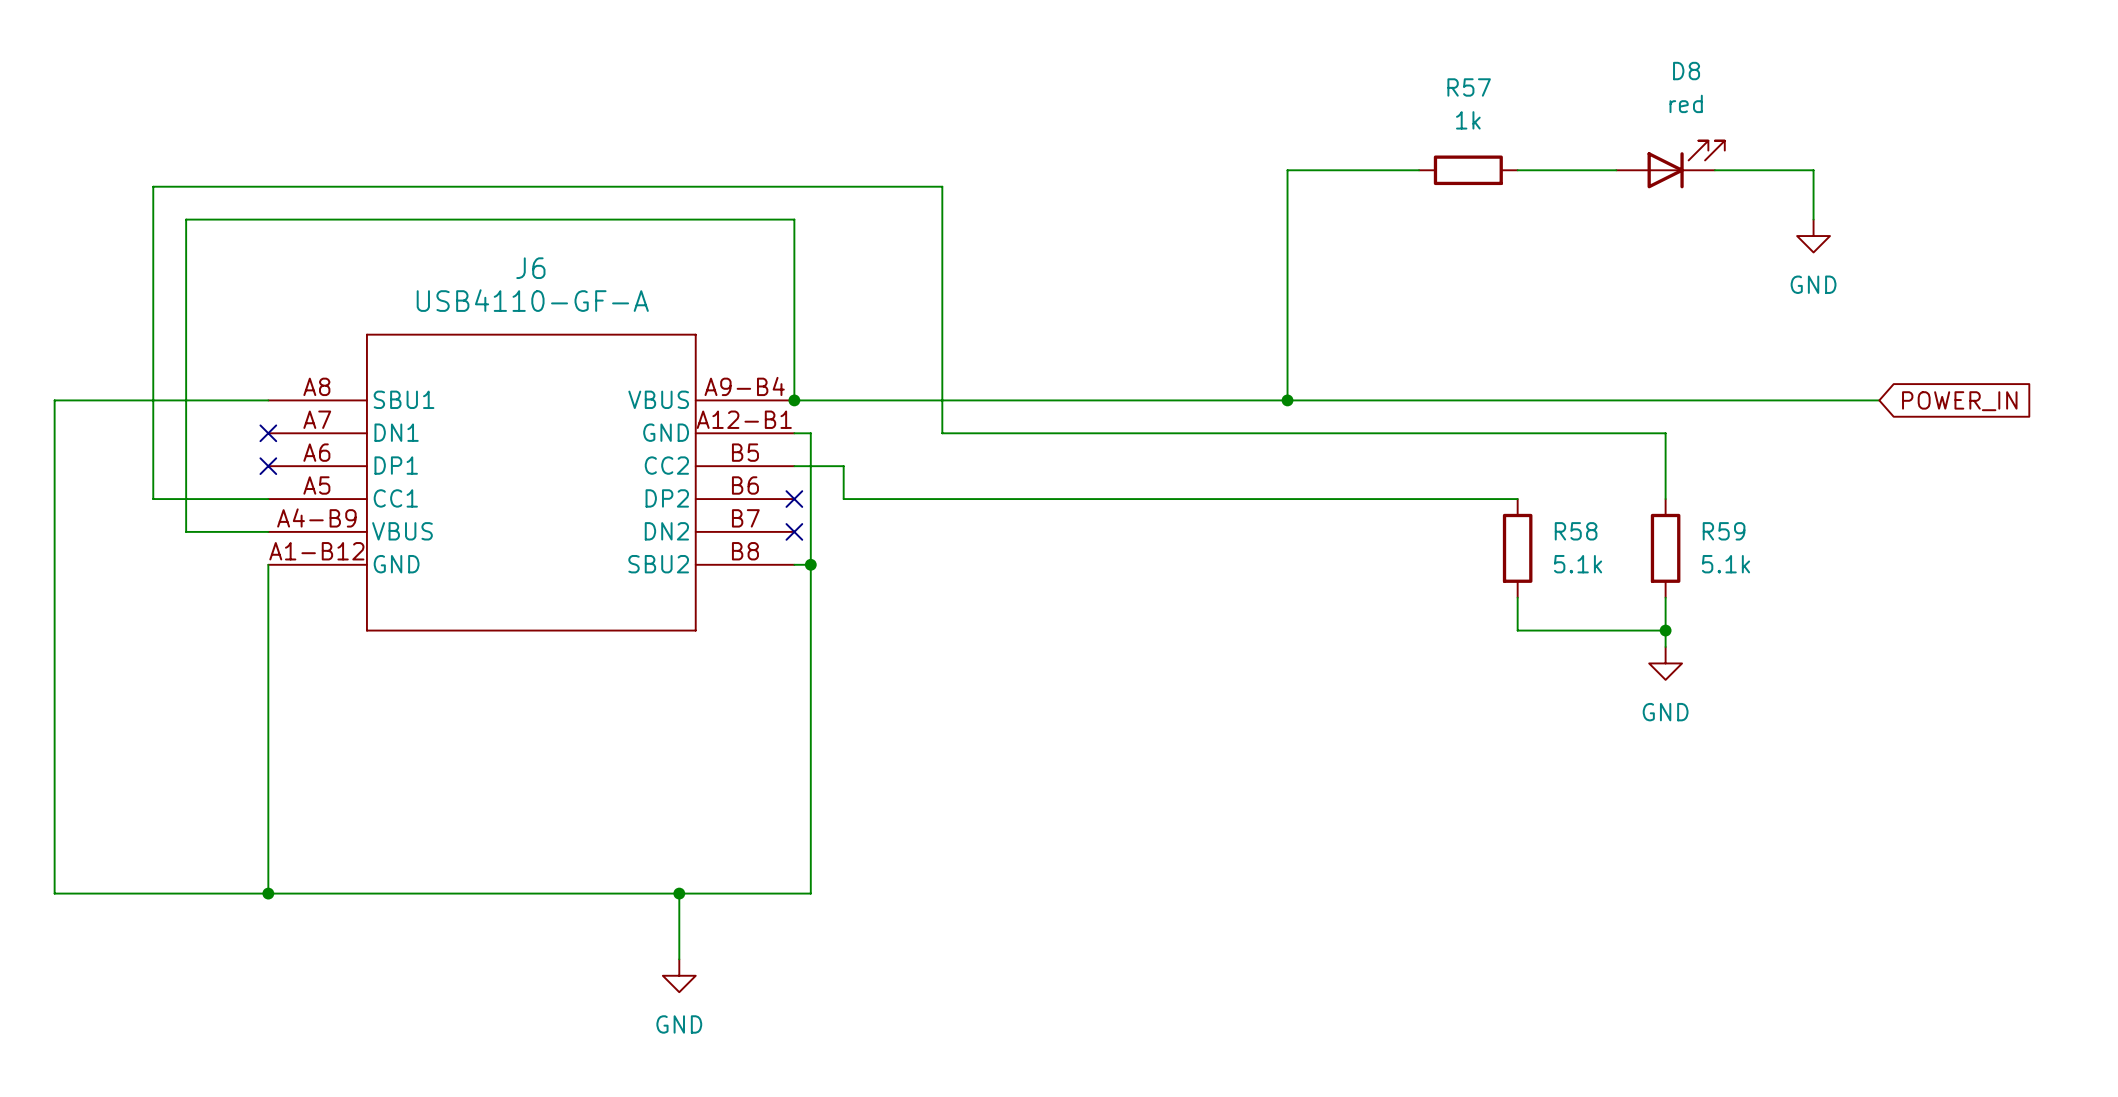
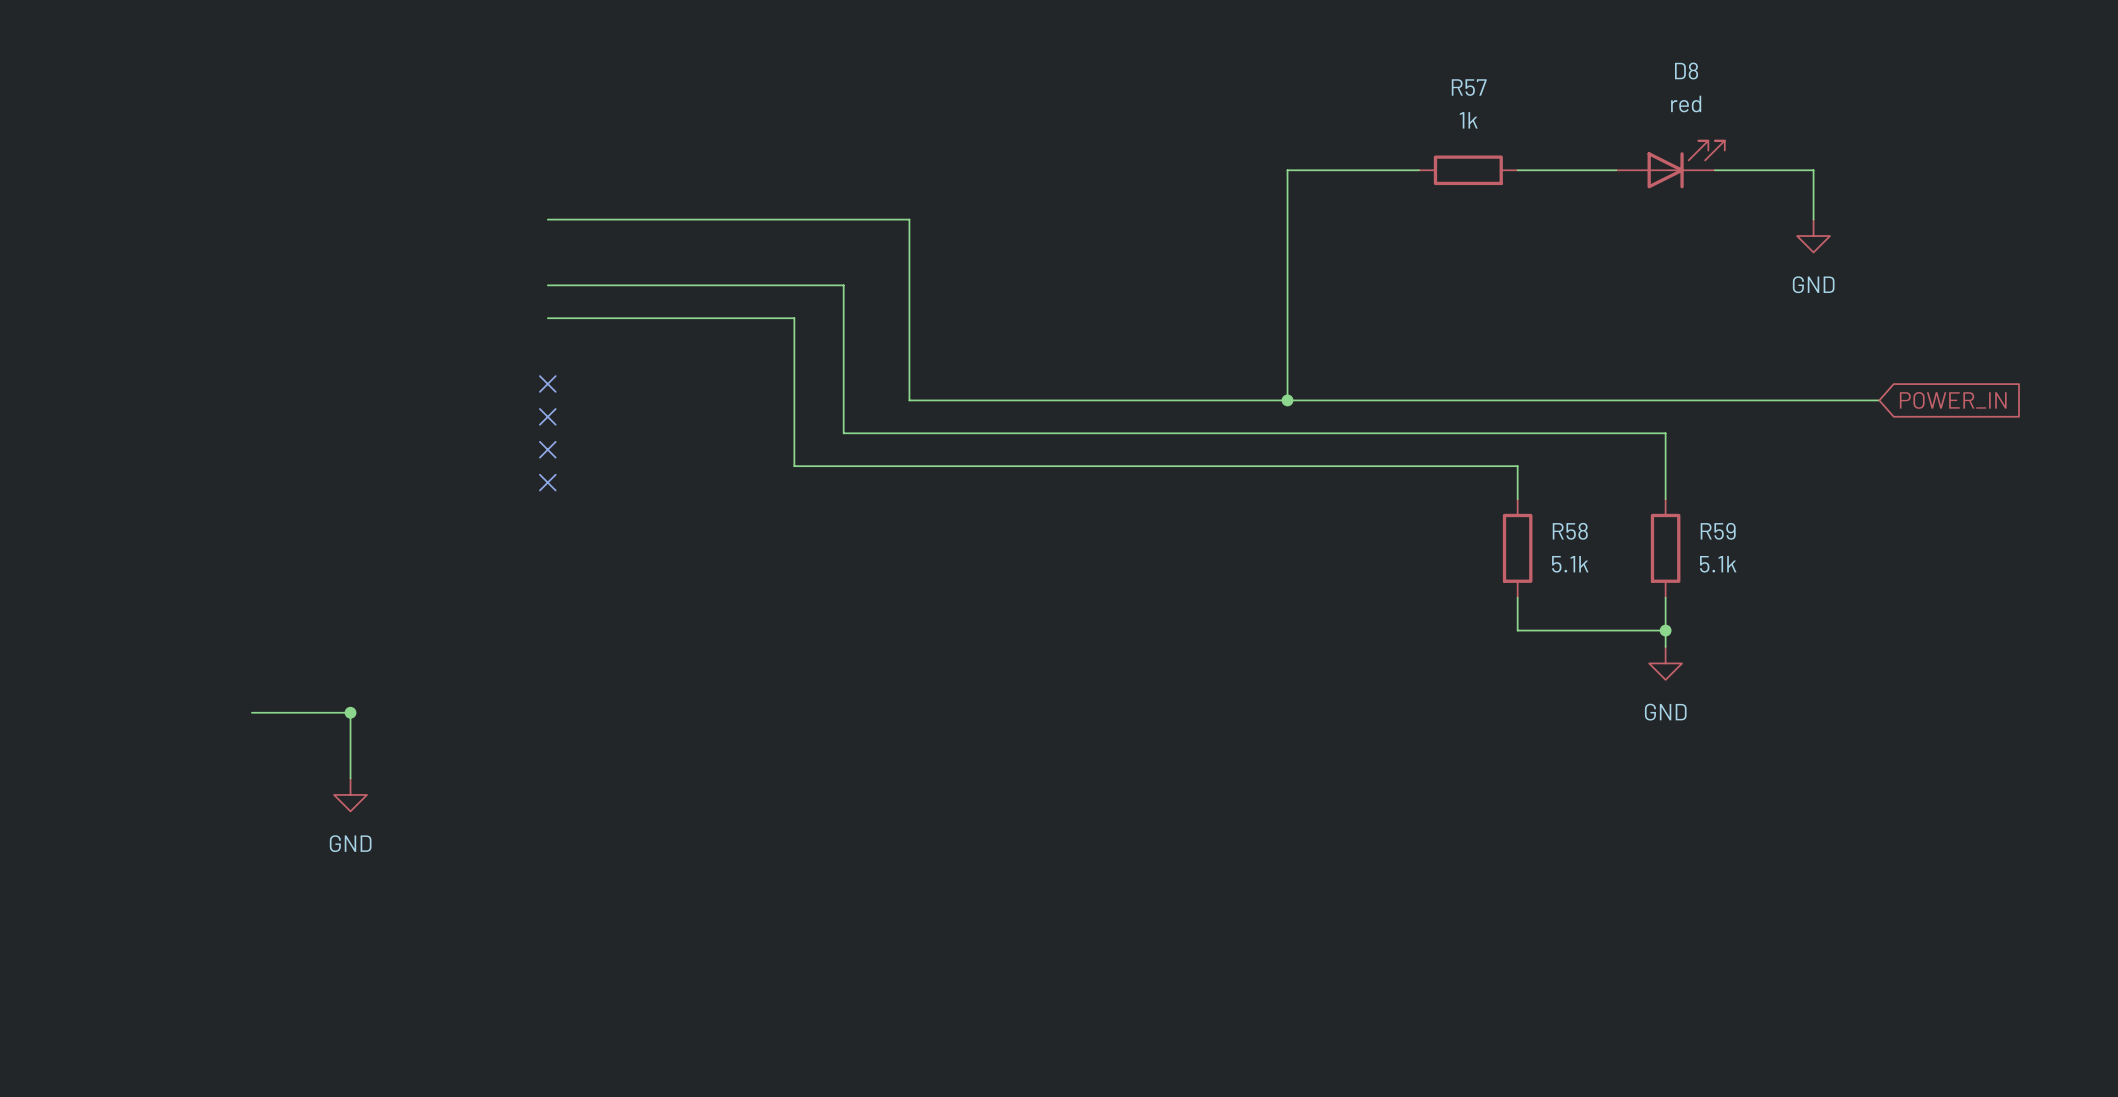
wire: (547, 219) (186, 219) (186, 531) (268, 531) -> none
wire: (794, 219) (794, 318) -> (794, 219) (909, 219) (909, 400)
wire: none -> (547, 318) (794, 318)
no-connect mark: none -> (547, 383)
wire: (268, 400) (54, 400) (54, 893) (810, 893) (810, 433) (794, 433) -> none
wire: (794, 400) (909, 400) -> (794, 400) (794, 466)
junction: (794, 400) -> none
no-connect mark: none -> (547, 416)
no-connect mark: (268, 433) -> none
wire: (942, 433) (942, 186) (153, 186) (153, 499) (268, 499) -> (942, 433) (843, 433) (843, 285) (547, 285)
no-connect mark: none -> (547, 449)
no-connect mark: (268, 466) -> none
wire: (843, 466) (843, 499) (1517, 499) -> (843, 466) (1517, 466) (1517, 499)
J6: USB4110-GF-A (531, 482) -> none
no-connect mark: none -> (547, 482)
no-connect mark: (794, 499) -> none
no-connect mark: (794, 531) -> none
wire: (268, 564) (268, 893) -> none
wire: (794, 564) (810, 564) -> none
junction: (810, 564) -> none
wire: none -> (251, 712) (350, 712) (350, 778)
junction: none -> (350, 712)
power symbol: none -> GND (350, 794)
junction: (268, 893) -> none
wire: (679, 893) (679, 959) -> none
junction: (679, 893) -> none
power symbol: GND (679, 975) -> none

